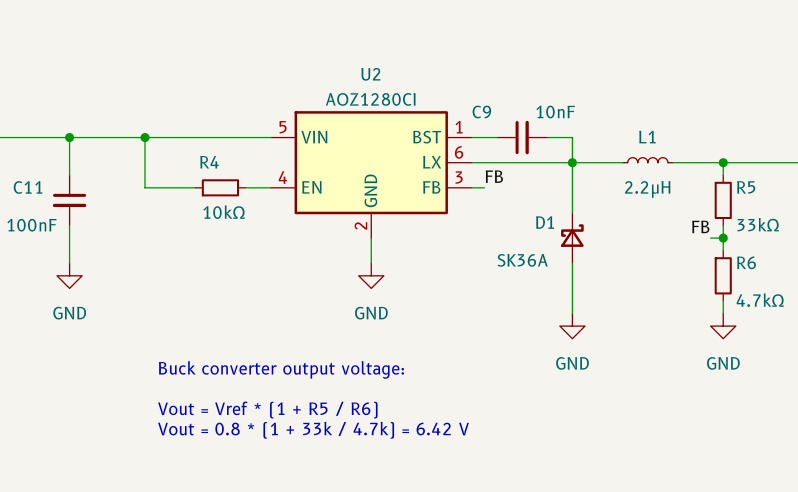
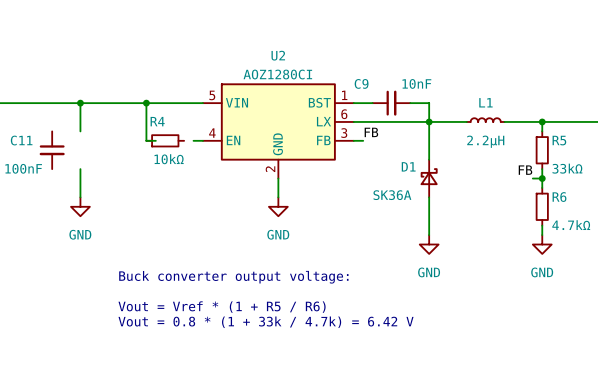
wire: (69, 137) (69, 175) -> (80, 103) (80, 131)
junction: (69, 137) -> none
junction: none -> (80, 103)
wire: (145, 137) (145, 187) (195, 187) -> none
junction: (145, 137) -> none
wire: none -> (146, 103) (146, 140) (155, 140)
junction: none -> (146, 103)
wire: (245, 187) (258, 187) -> none
wire: (69, 225) (69, 263) -> (80, 169) (80, 197)
power symbol position: GND (69, 275) -> GND (80, 206)

